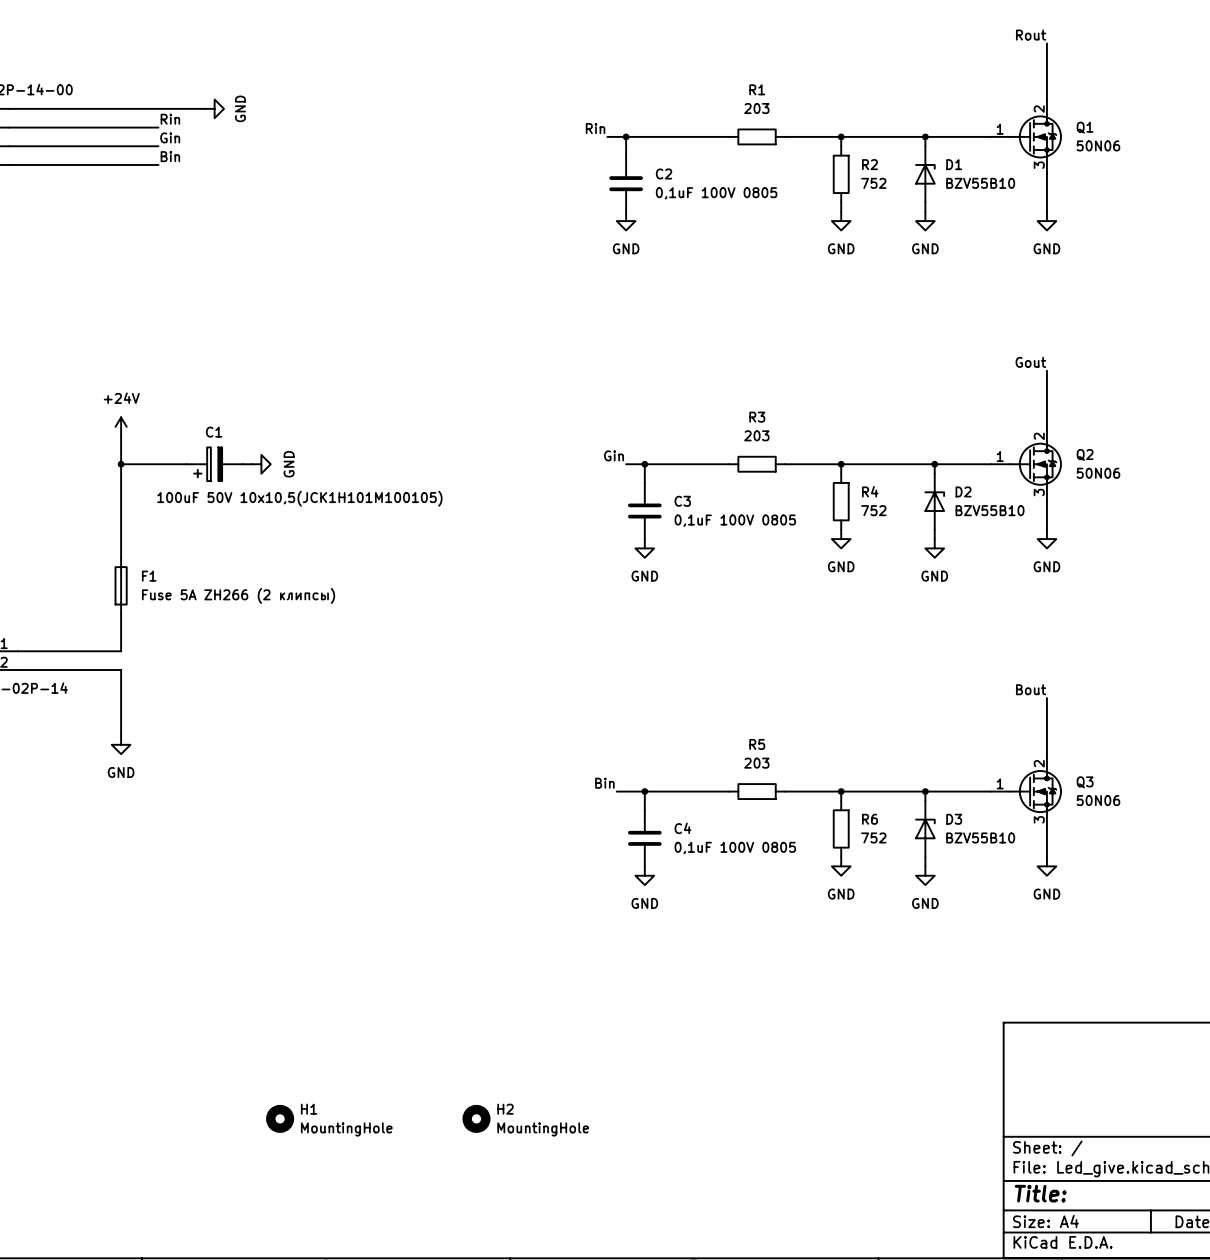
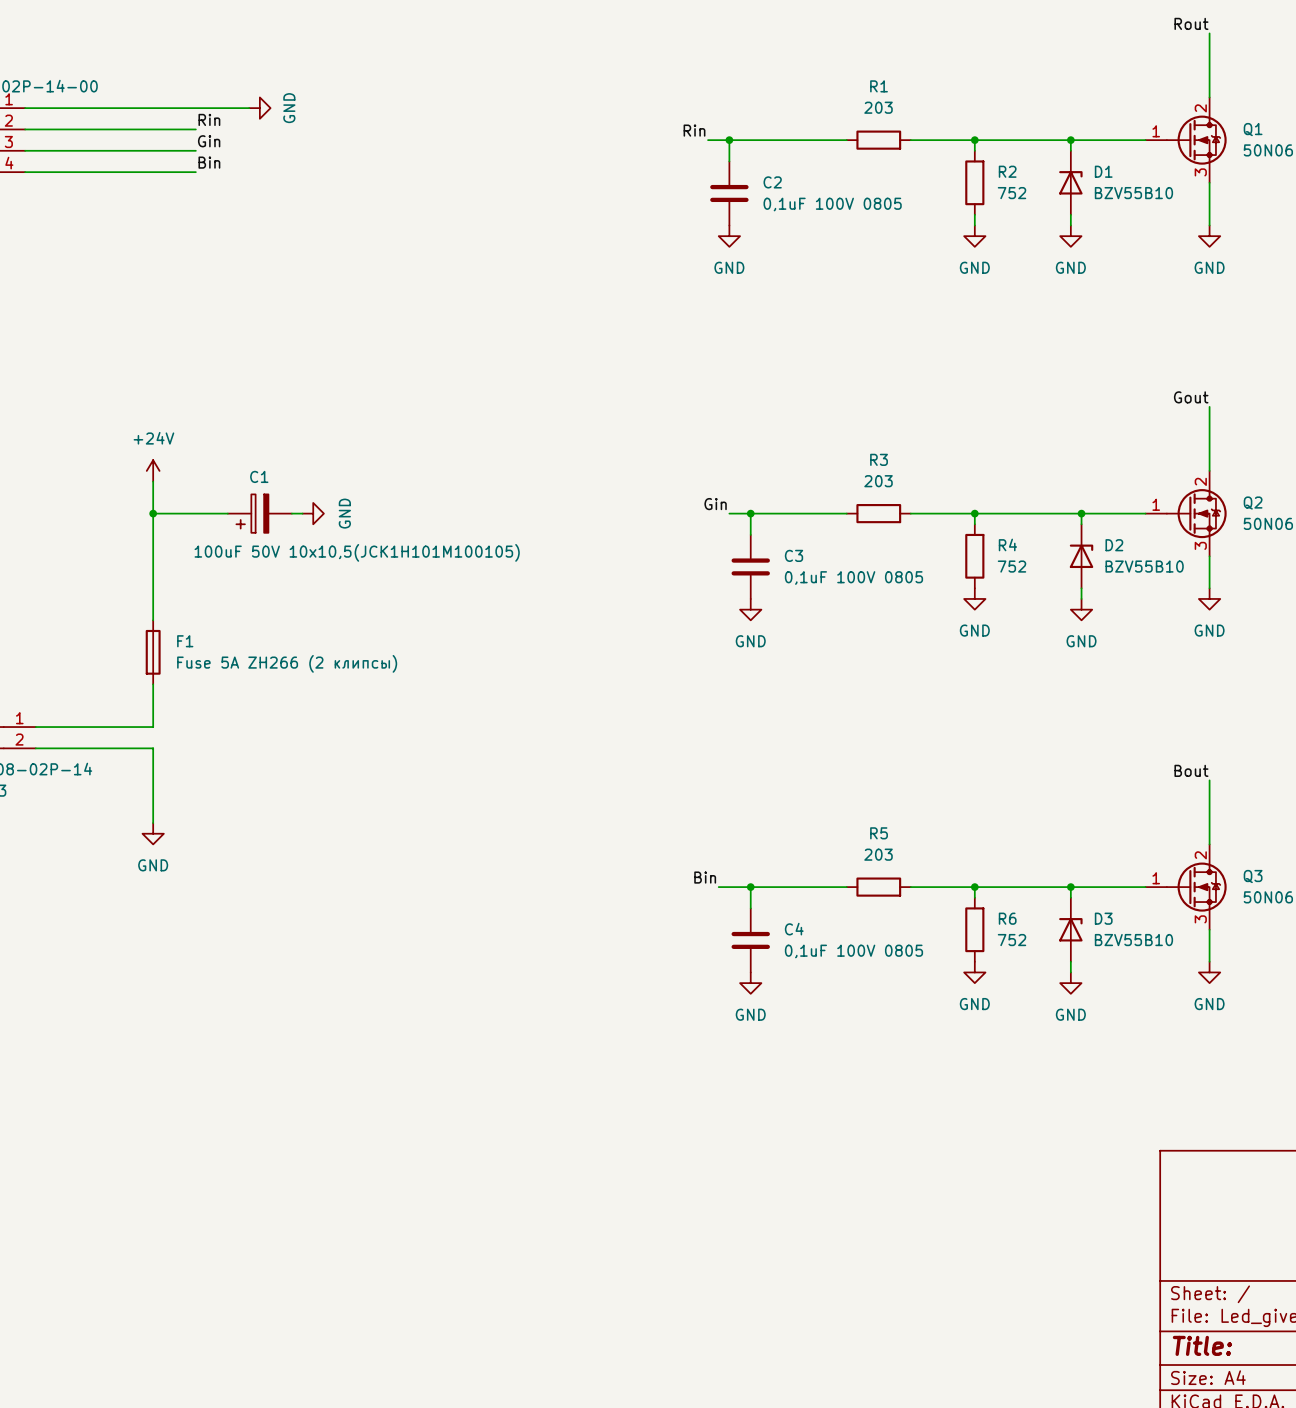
H1: MountingHole (280, 1118) -> none
H2: MountingHole (476, 1118) -> none

